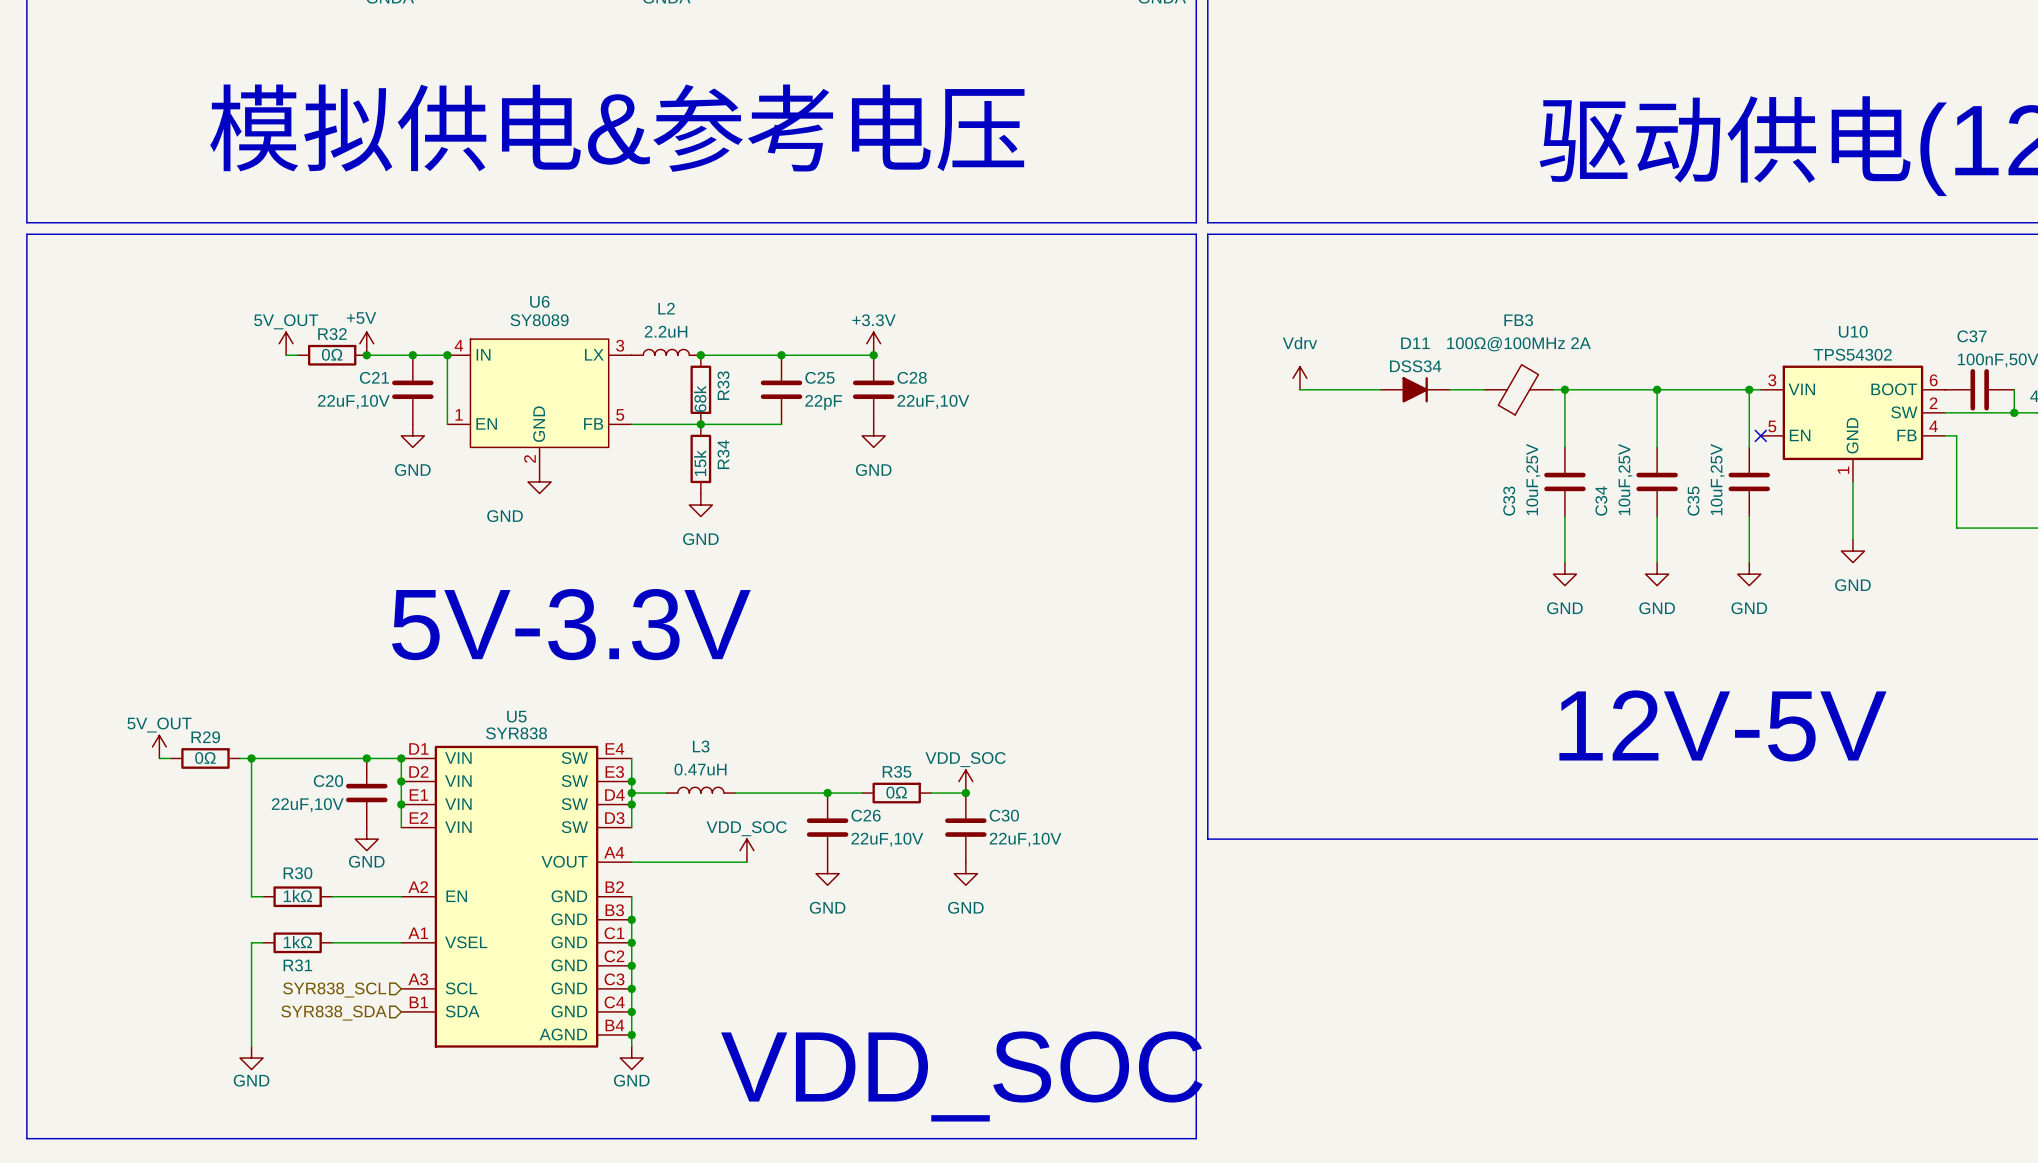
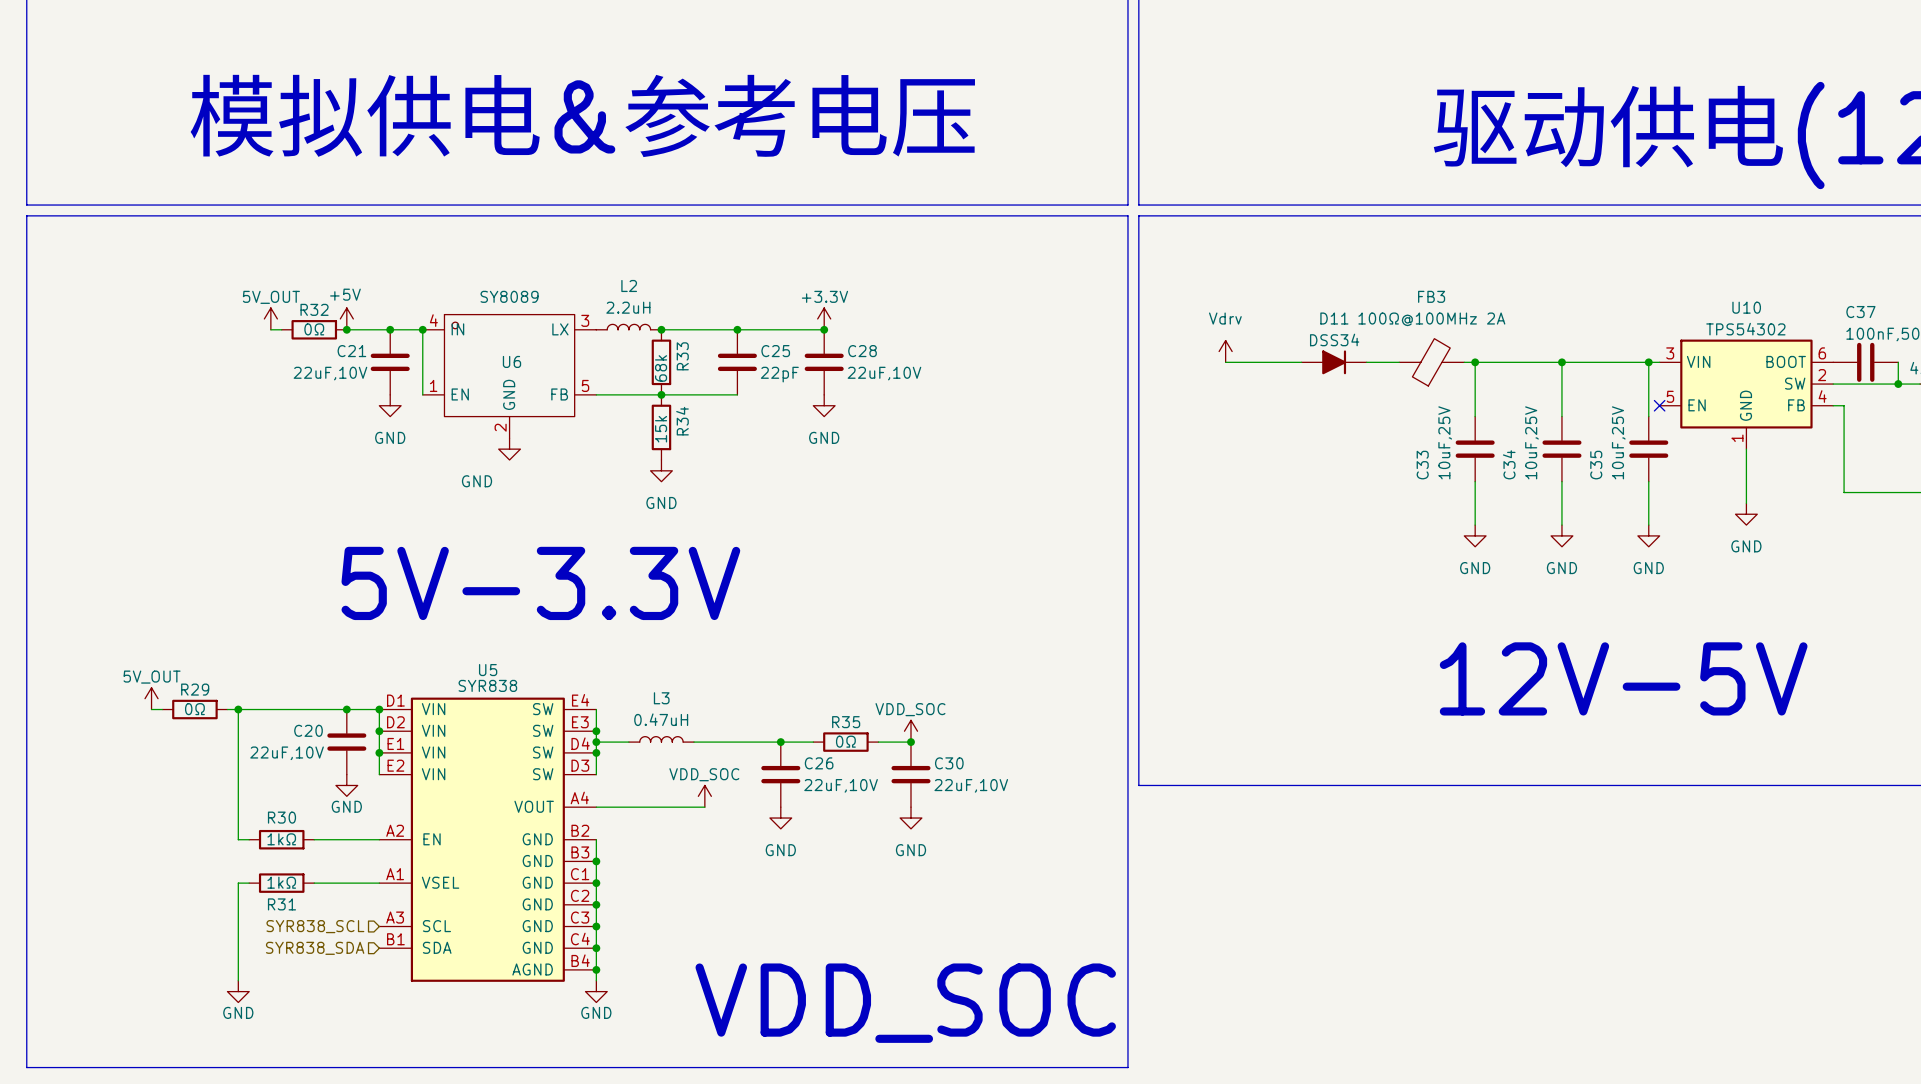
U6 name position: U6 (539, 301) -> U6 (511, 361)
U6 symbol: [447, 339, 632, 471] -> [422, 314, 597, 439]

